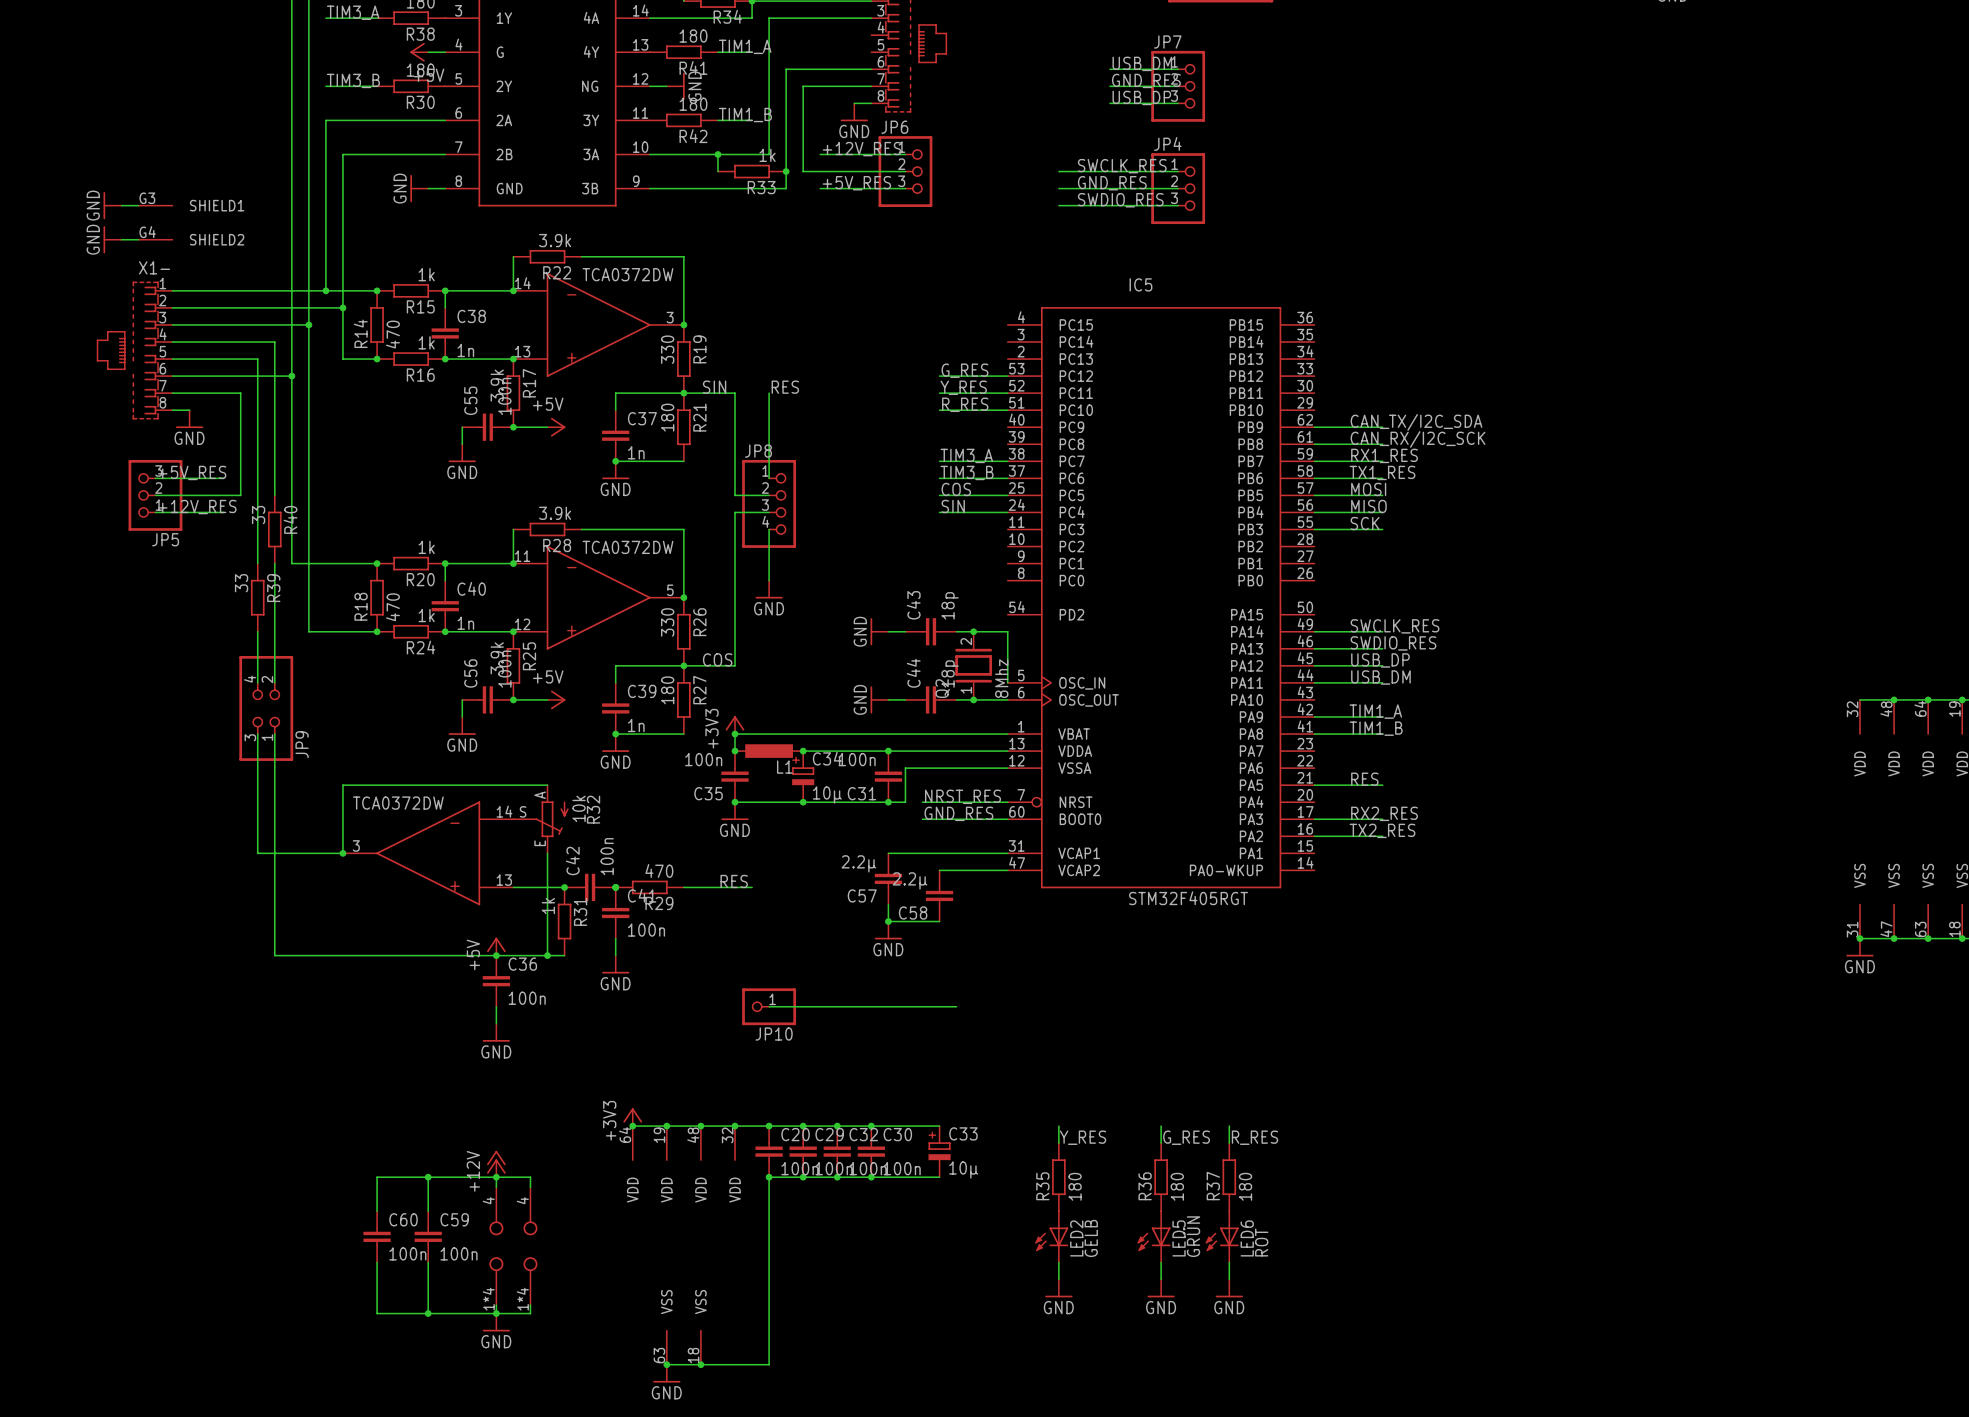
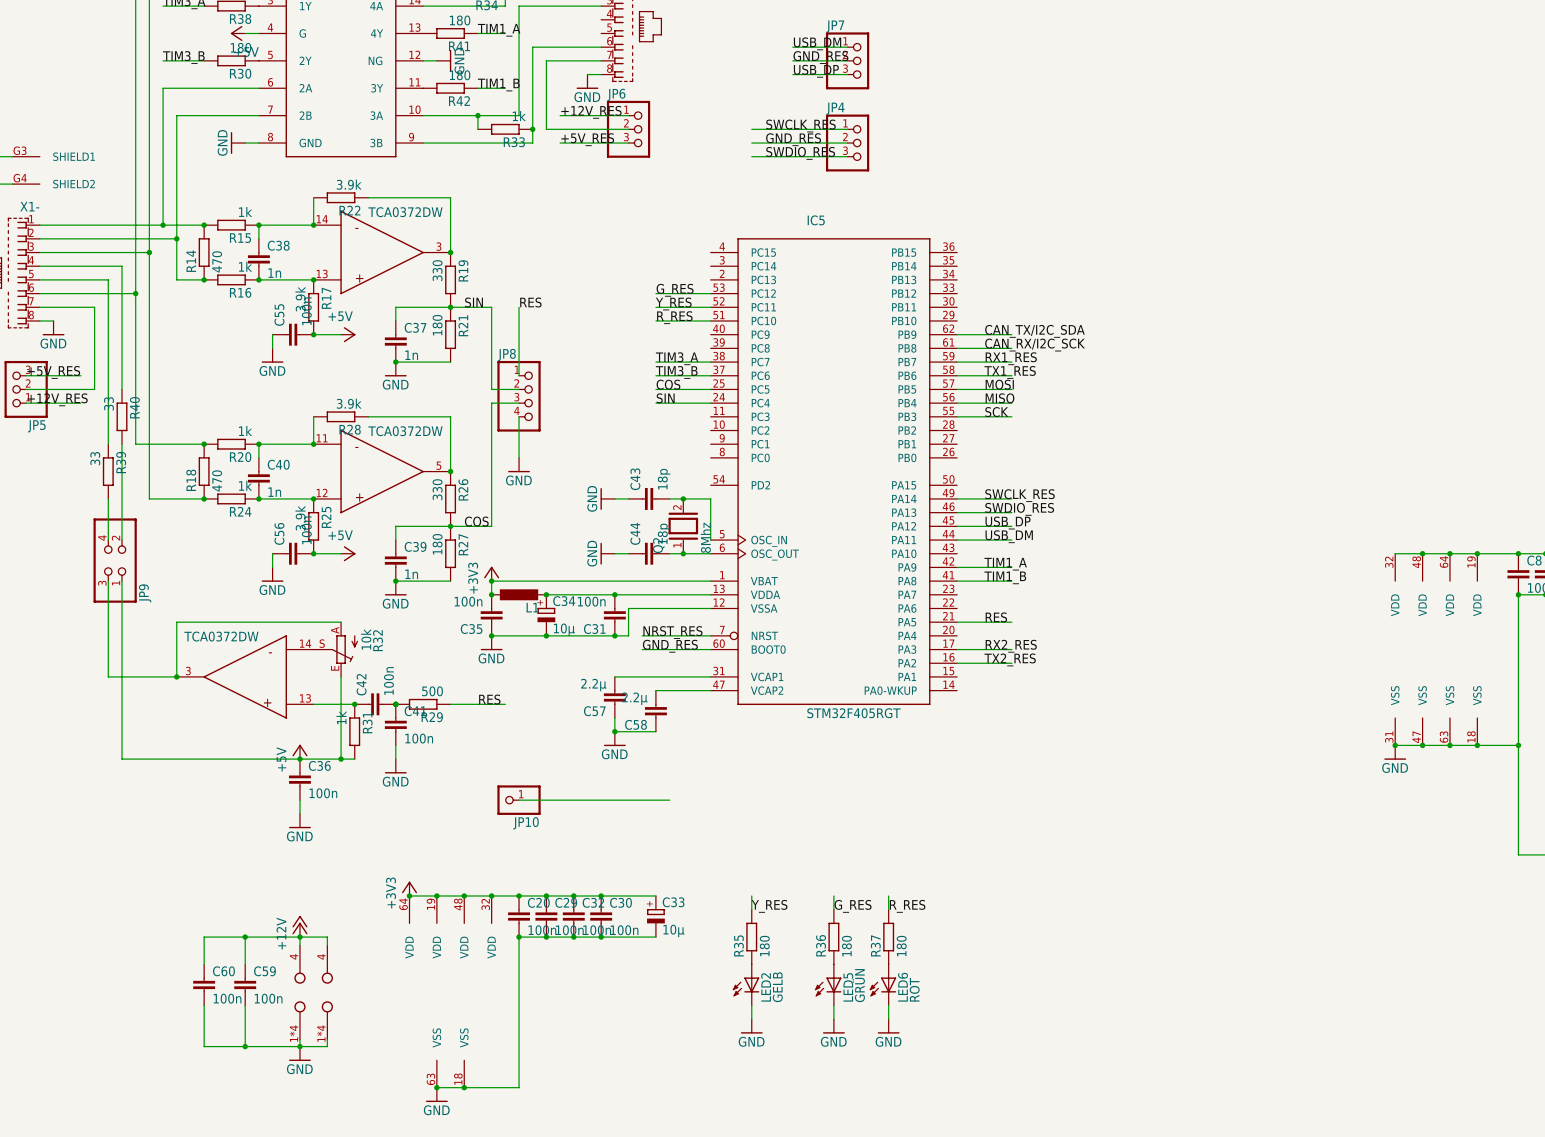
R29 value: 470 (659, 870) -> 500 (432, 691)

